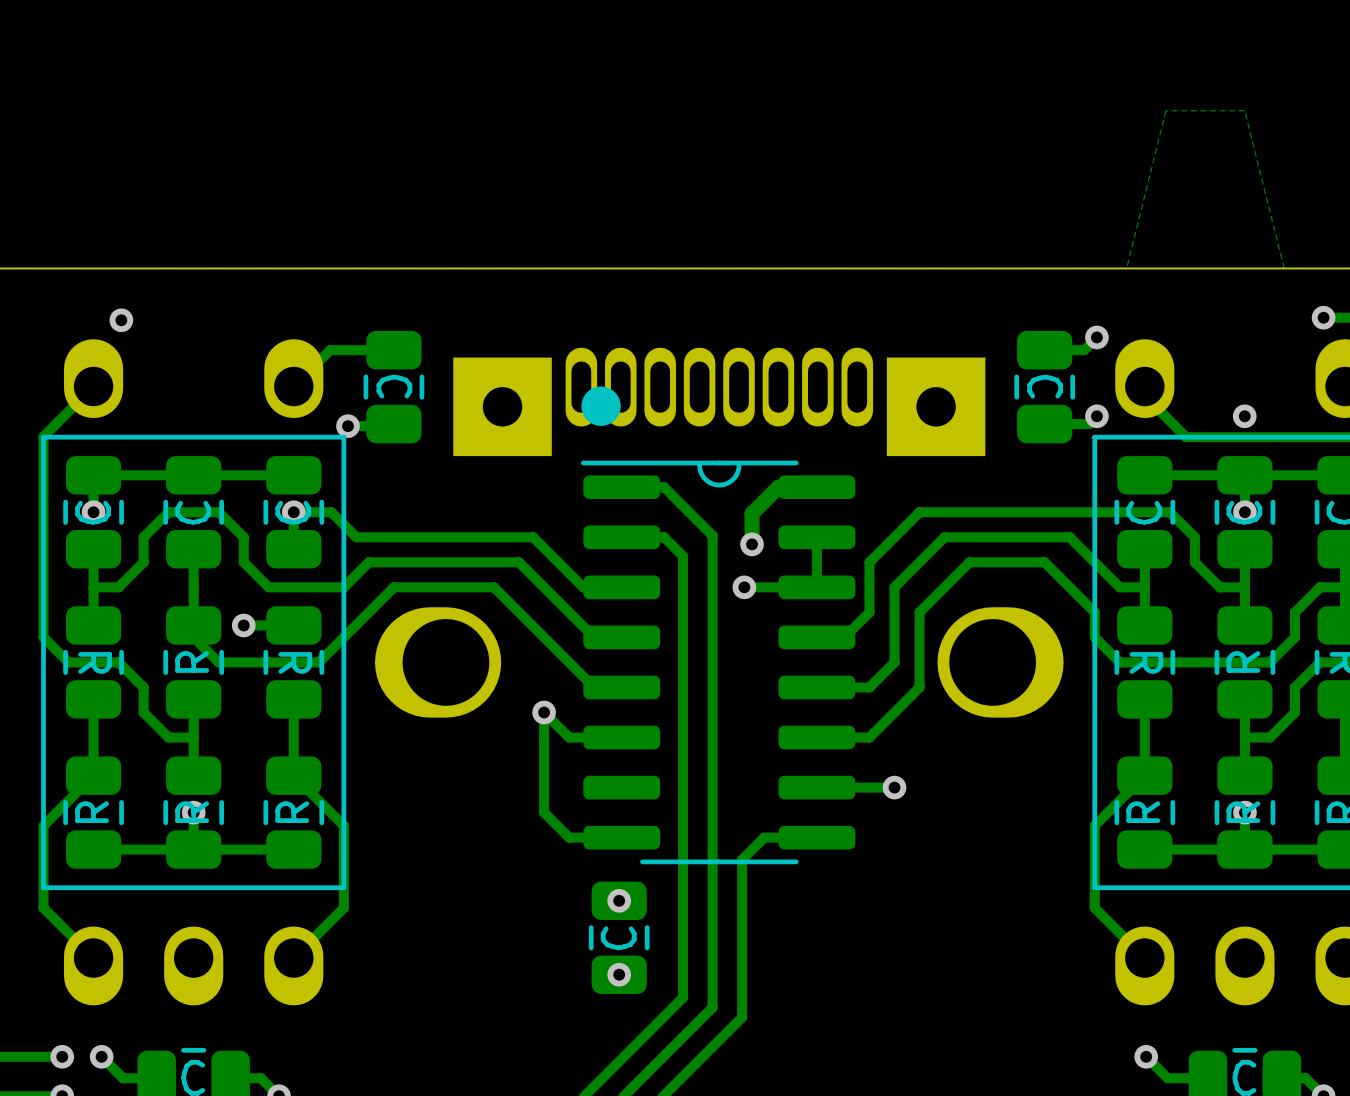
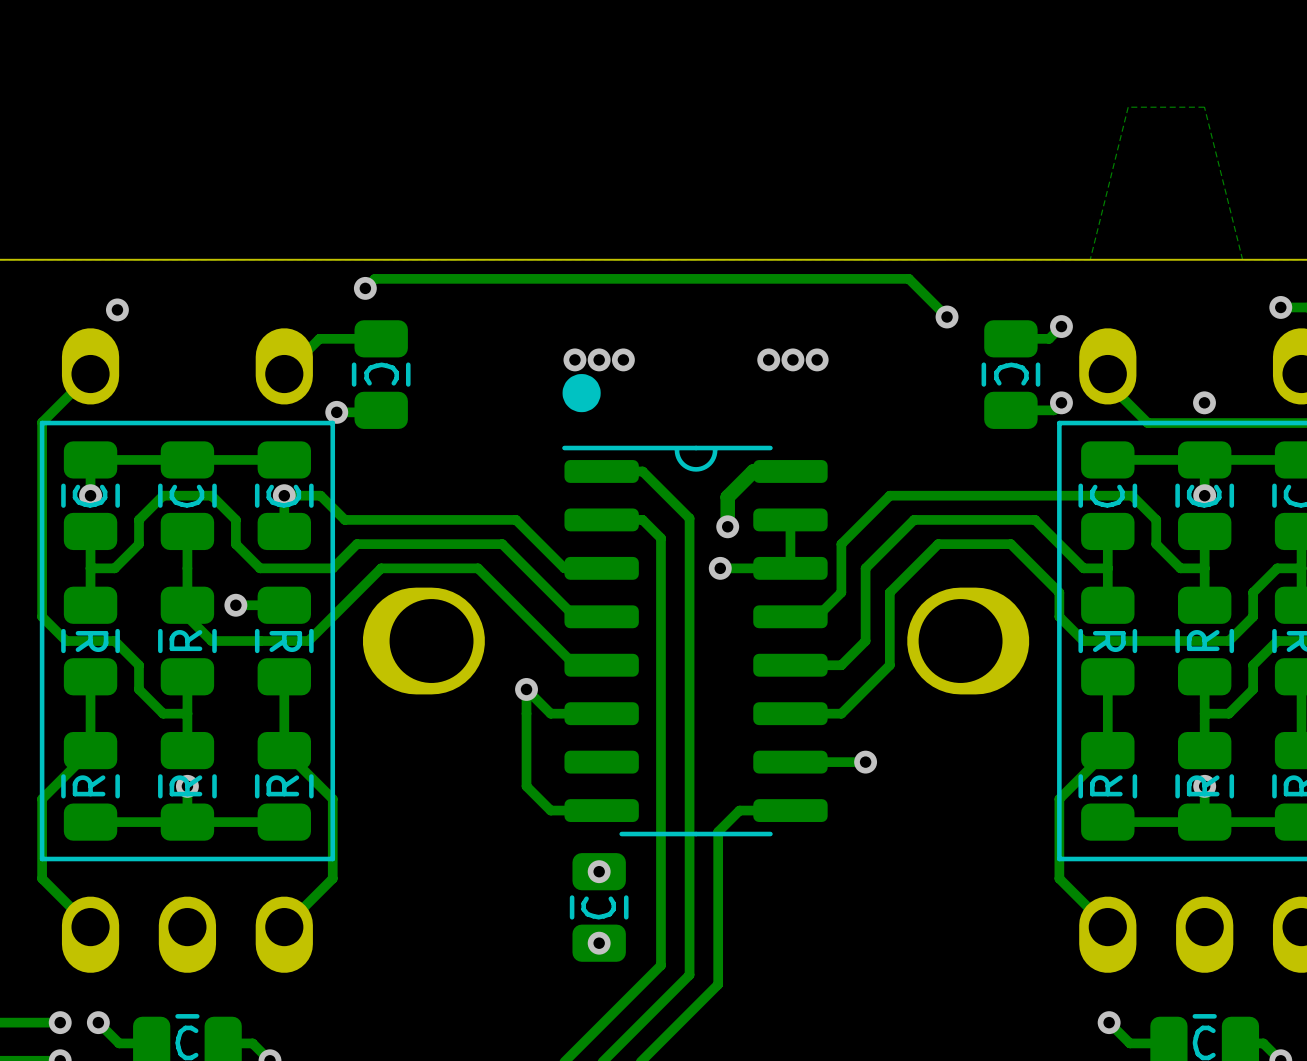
track: none -> (365, 288) (374, 278) (908, 278) (947, 317)
via: none -> (365, 288)
via: none -> (947, 317)
via: none -> (574, 359)
via: none -> (599, 359)
via: none -> (623, 359)
via: none -> (768, 359)
via: none -> (792, 359)
via: none -> (817, 359)
part: (719, 401) -> none

